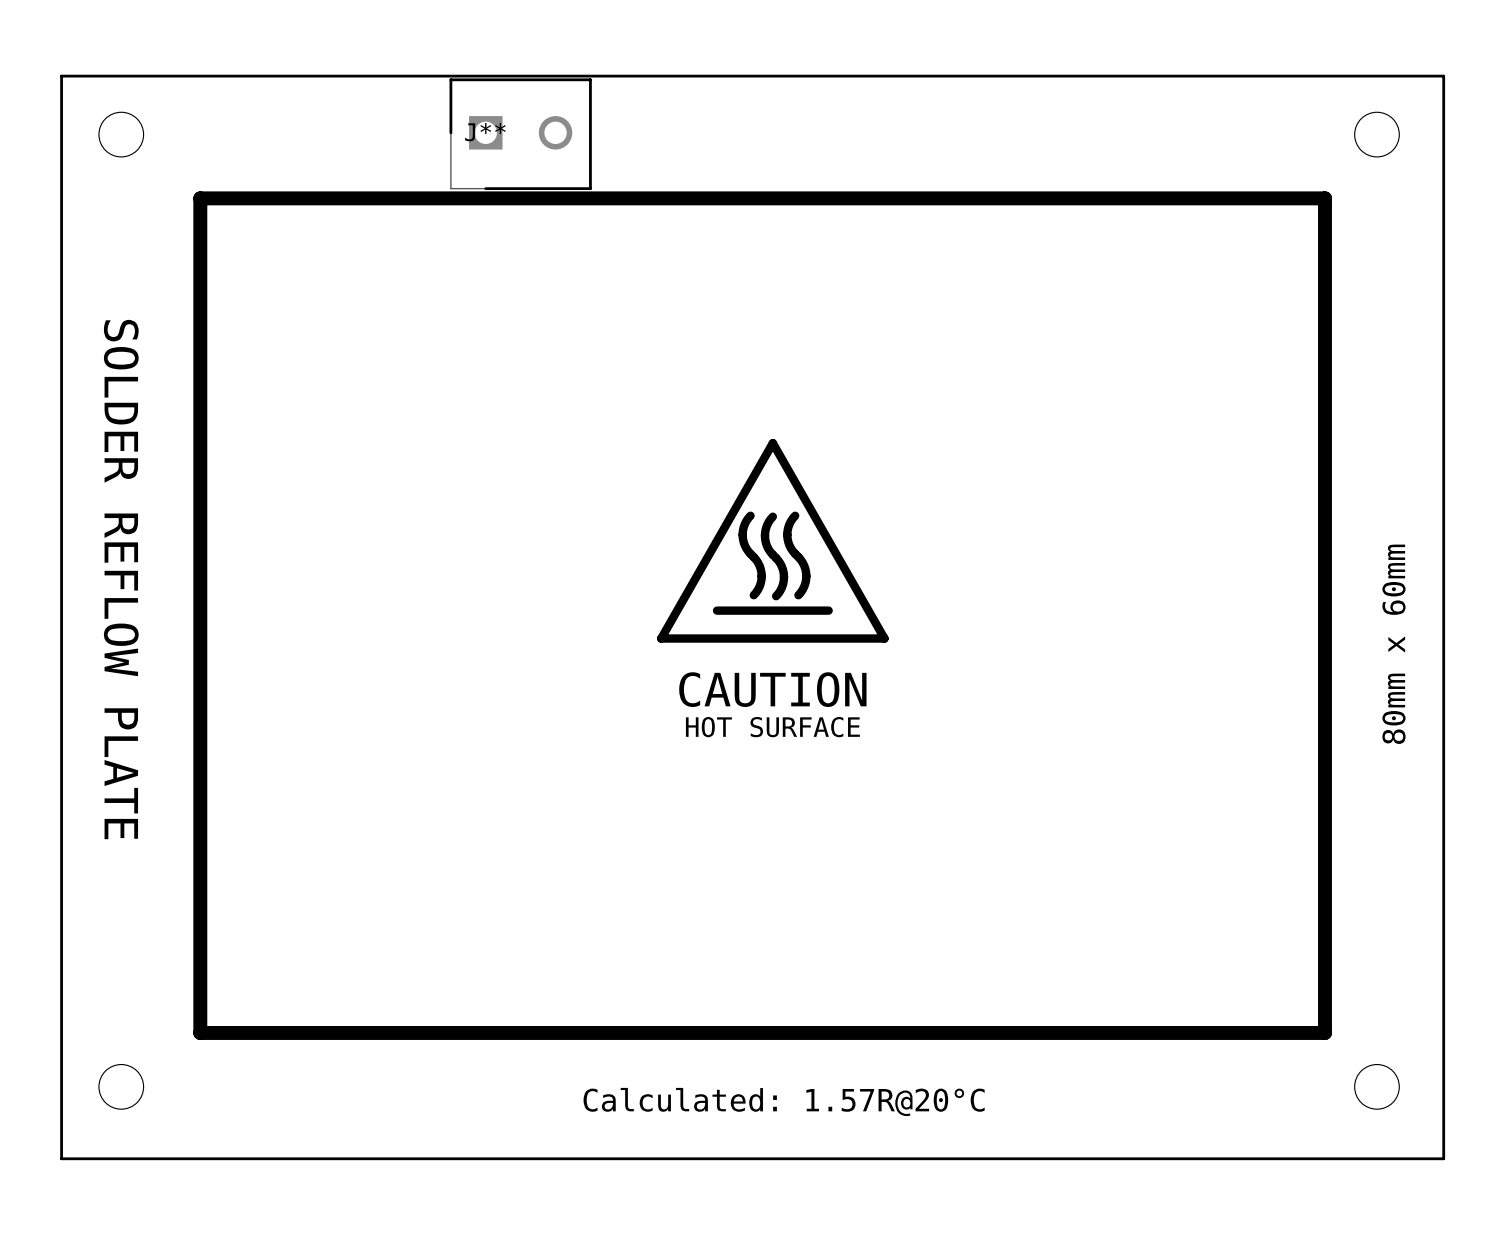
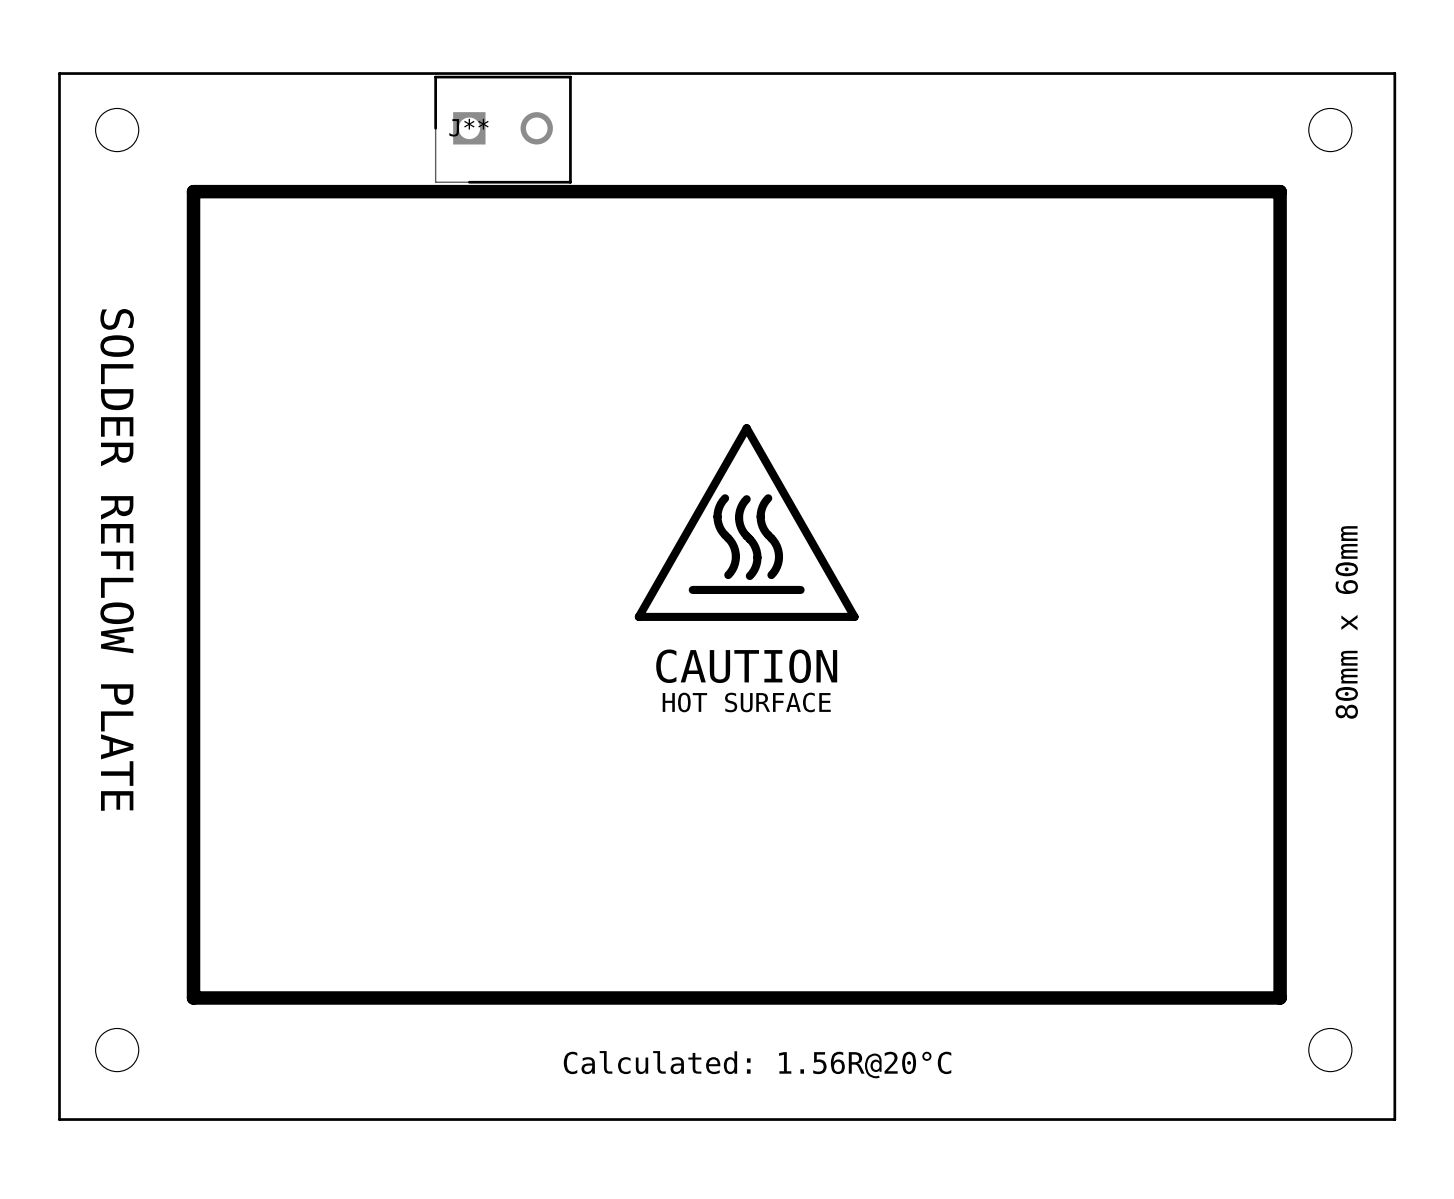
text: Calculated: 1.57R@20°C (784, 1102) -> Calculated: 1.56R@20°C (757, 1064)

